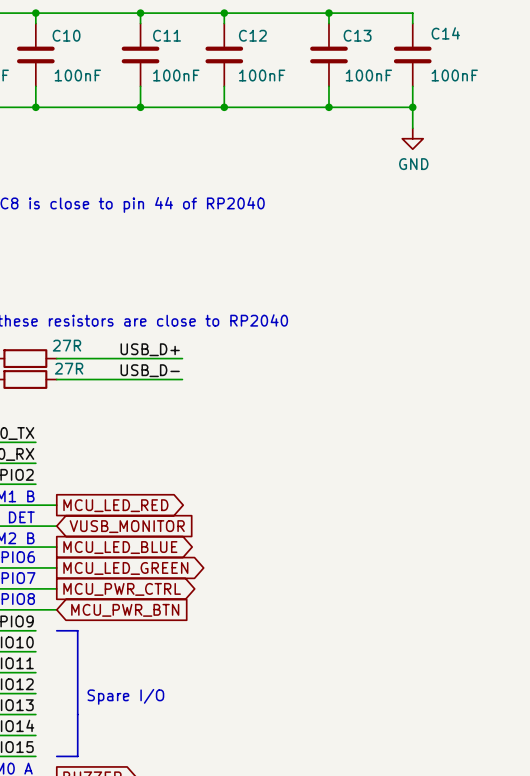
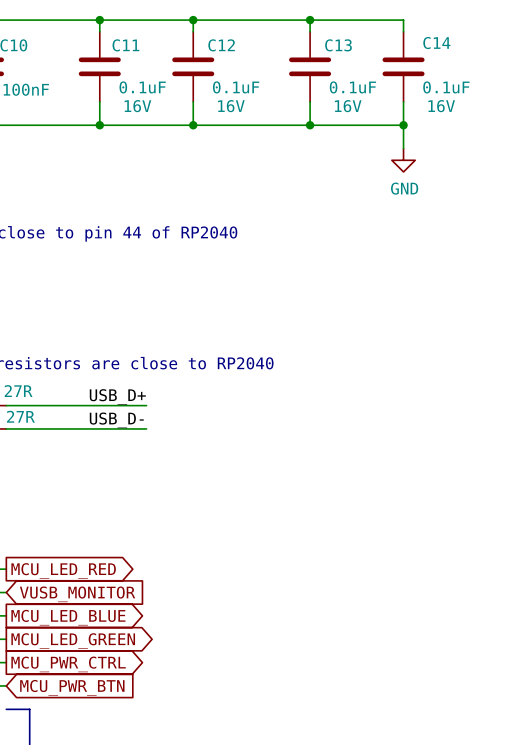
C11 value: 100nF (176, 75) -> 0.1uF (142, 87)
C12 value: 100nF (262, 75) -> 0.1uF (236, 87)
C13 value: 100nF (368, 75) -> 0.1uF (352, 87)
C14 value: 100nF (454, 75) -> 0.1uF (446, 87)
C11 text: none -> 16V (137, 106)
C12 text: none -> 16V (231, 106)
C13 text: none -> 16V (348, 106)
C14 text: none -> 16V (441, 106)

